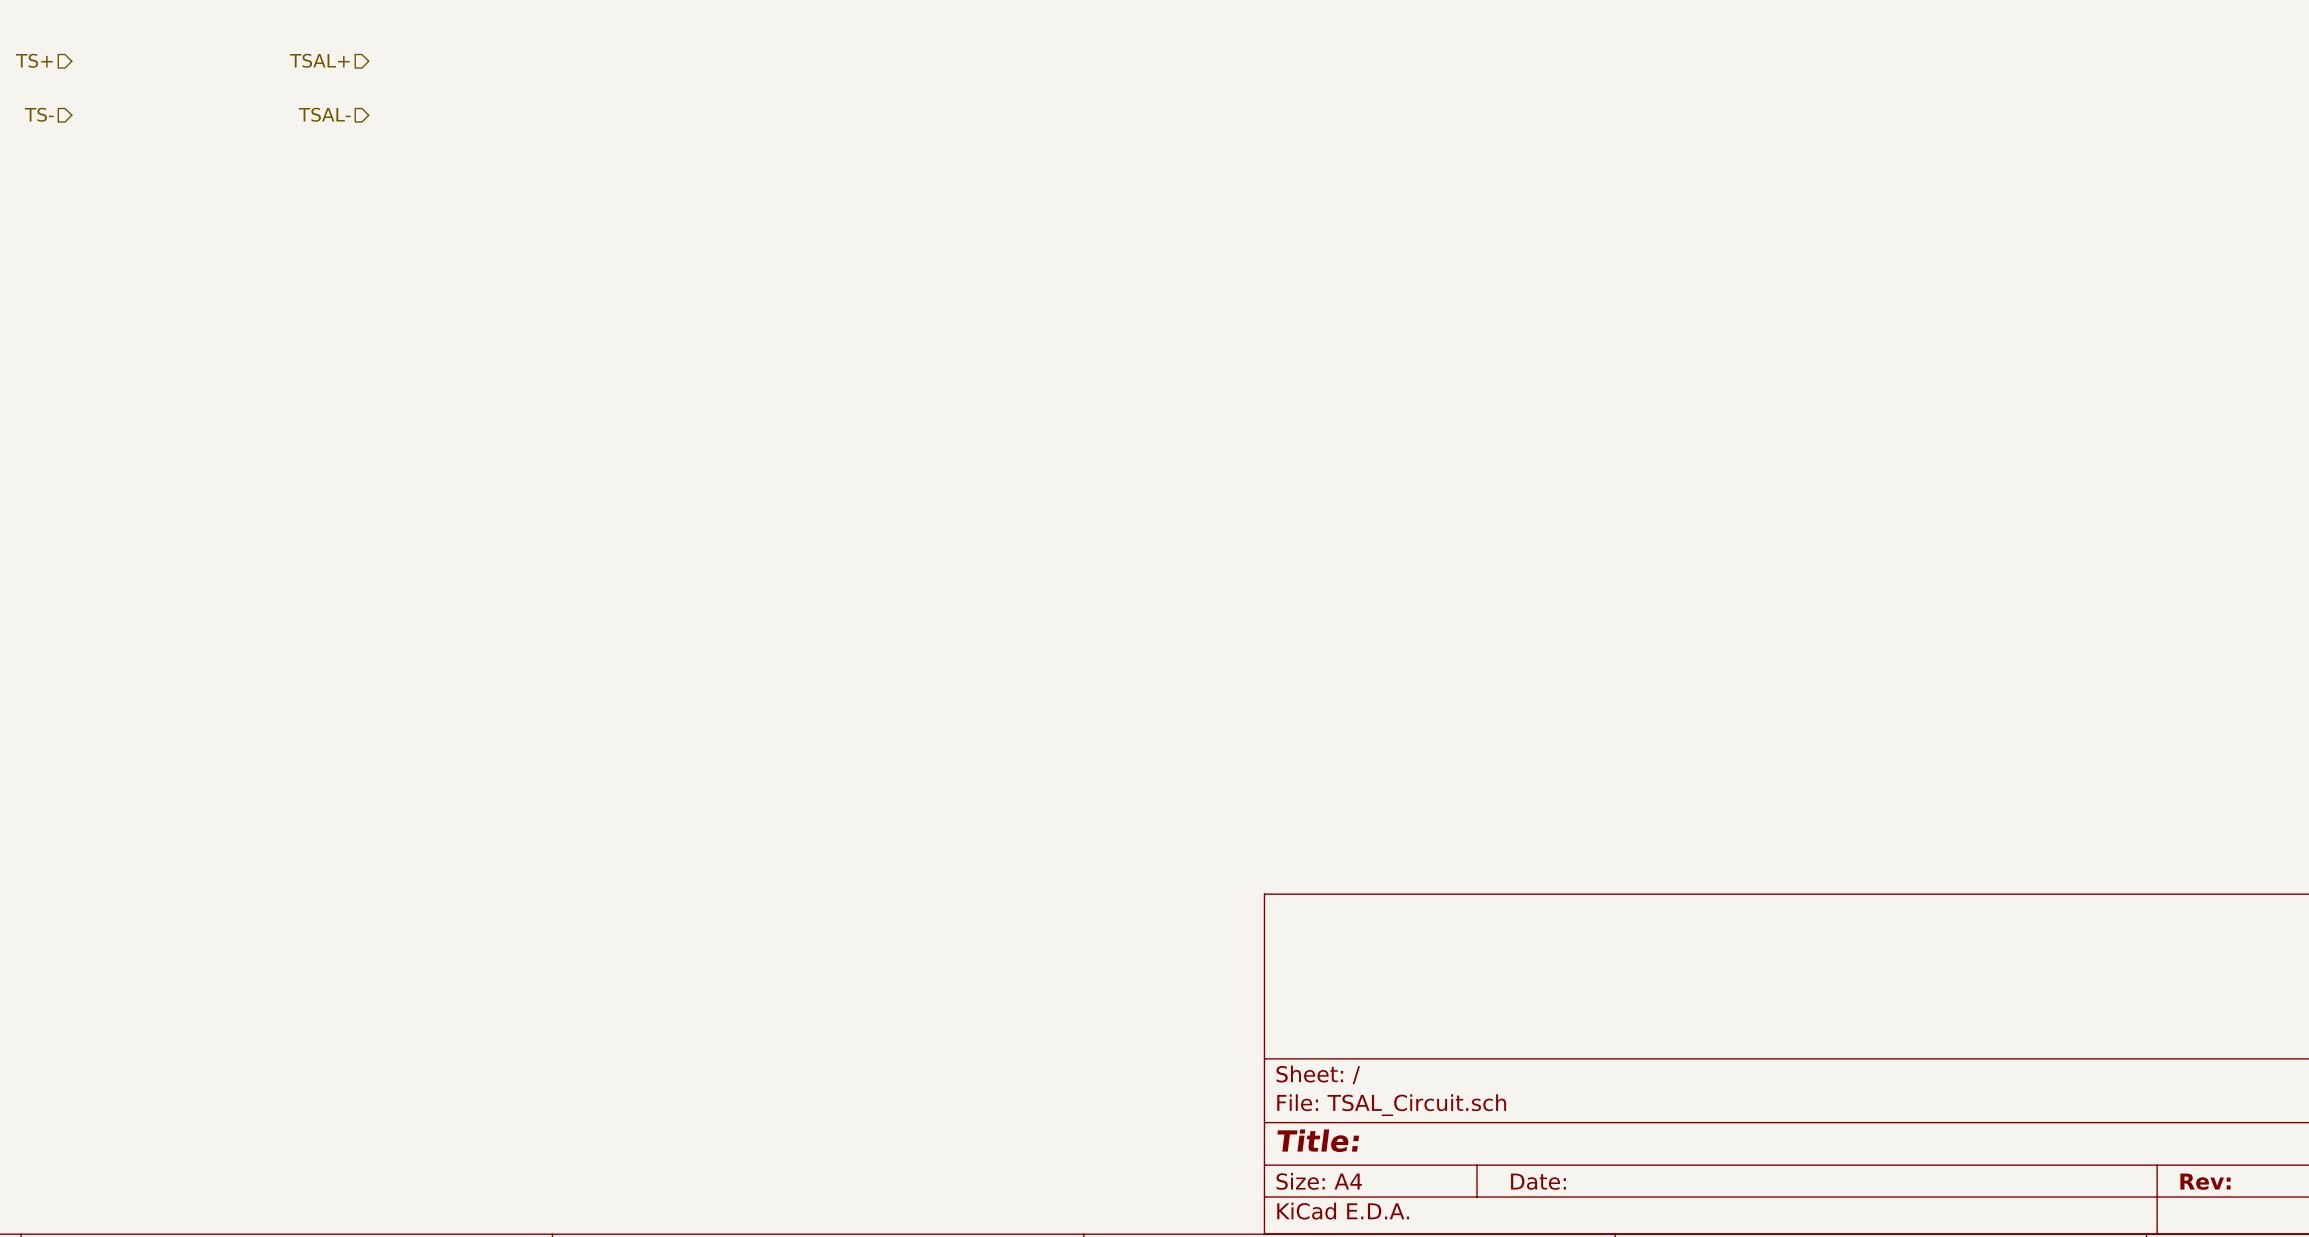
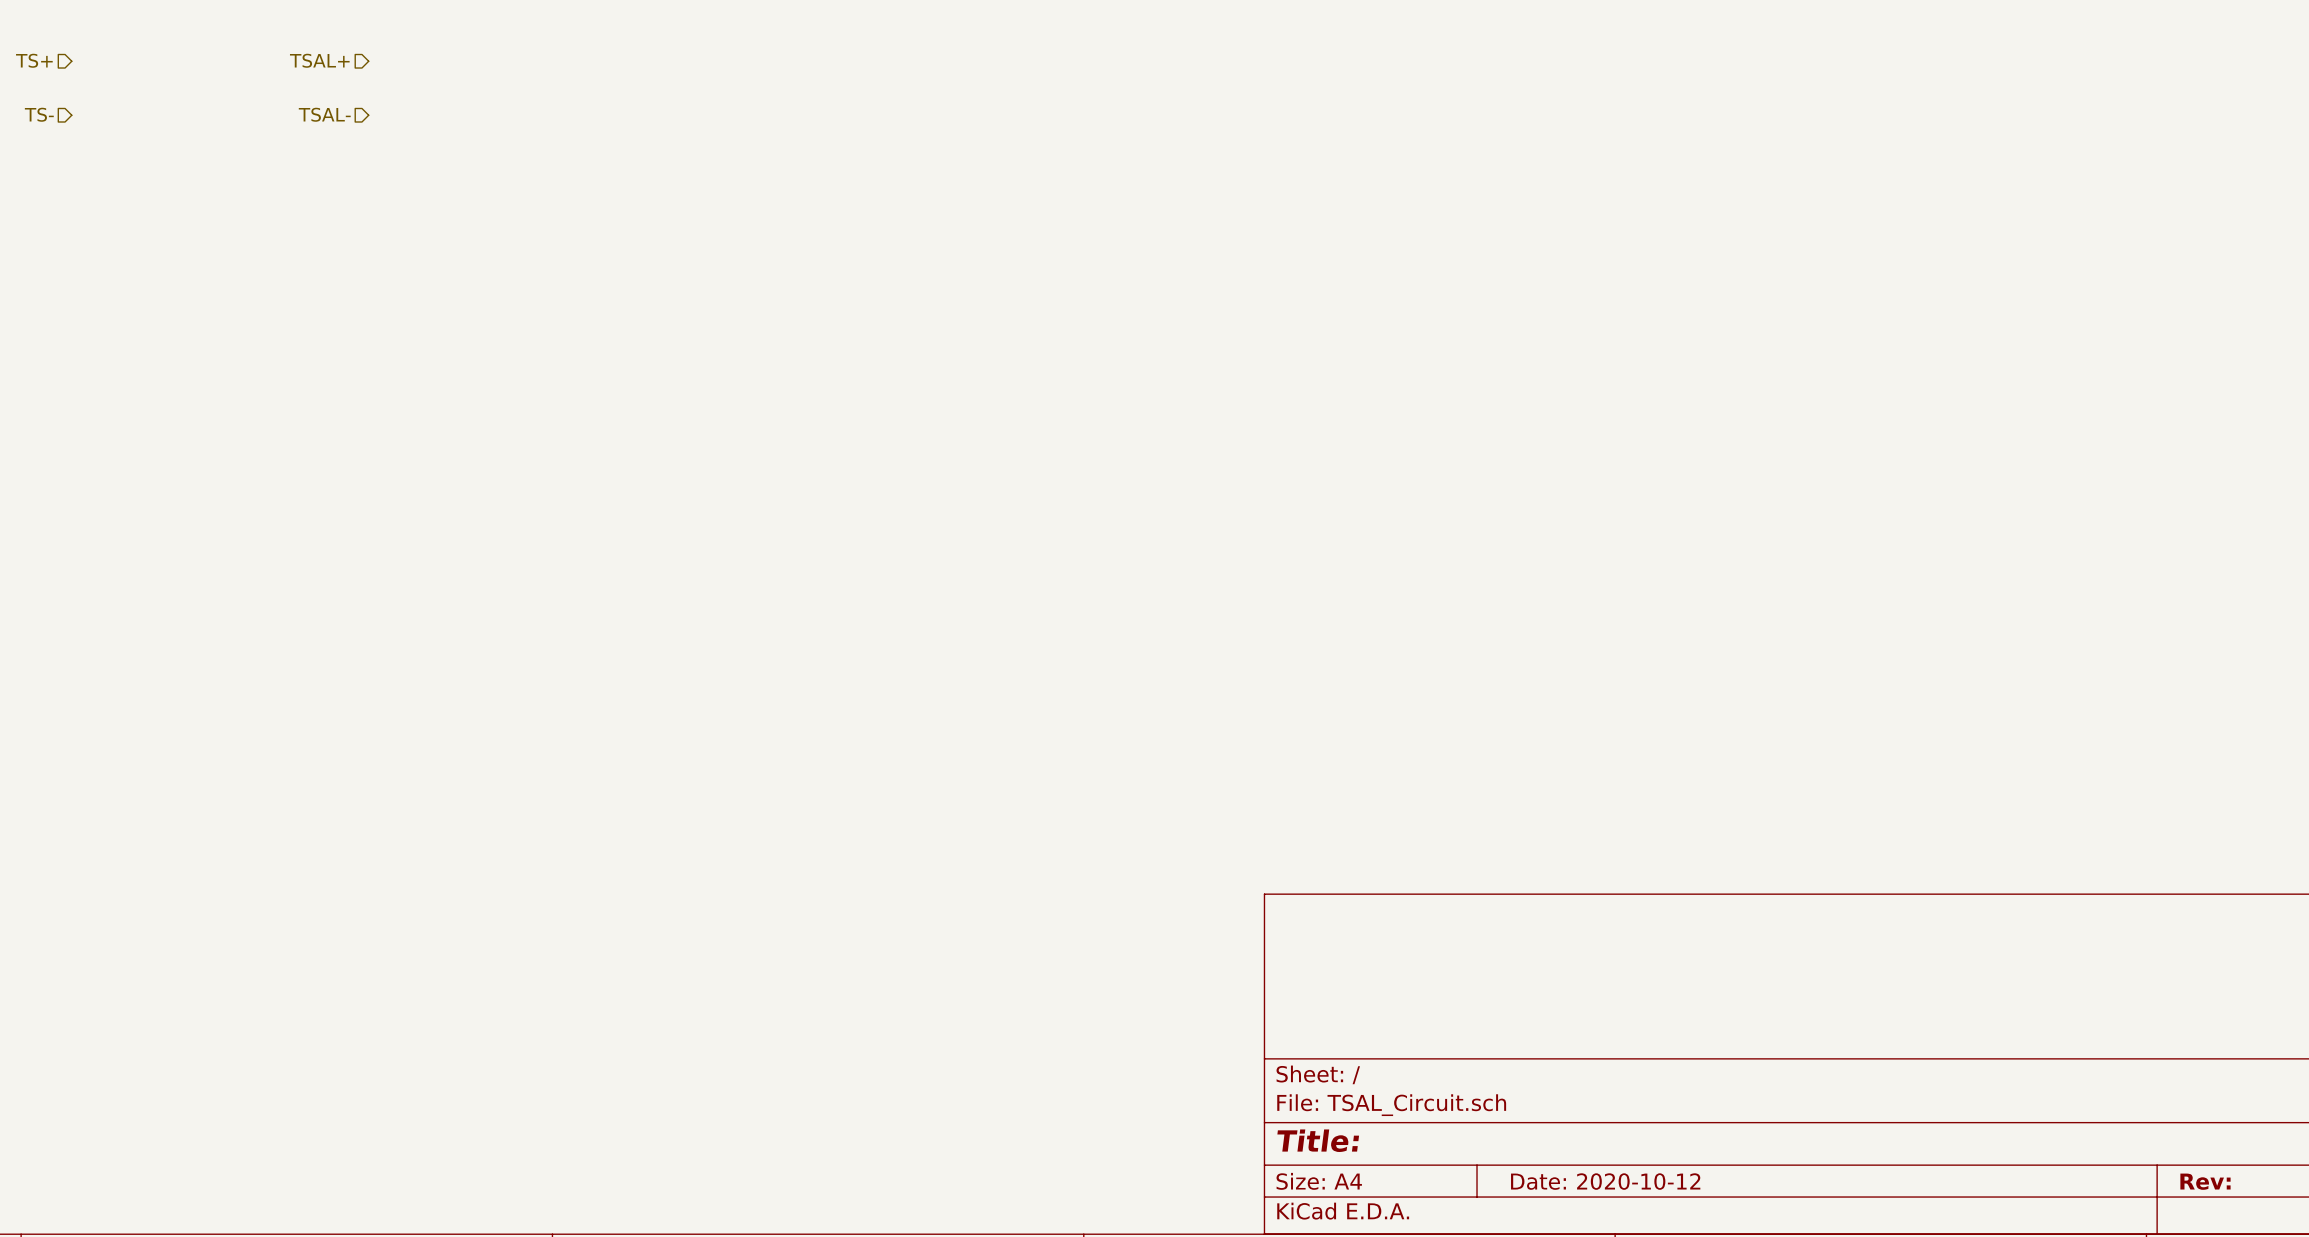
title block: Date: (1538, 1181) -> Date: 2020-10-12 (1605, 1181)

